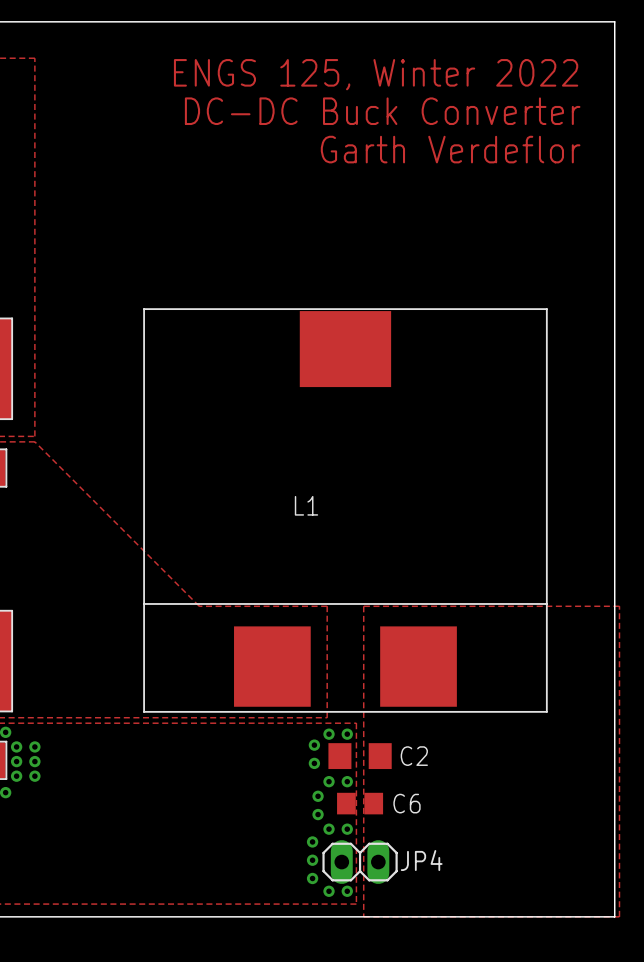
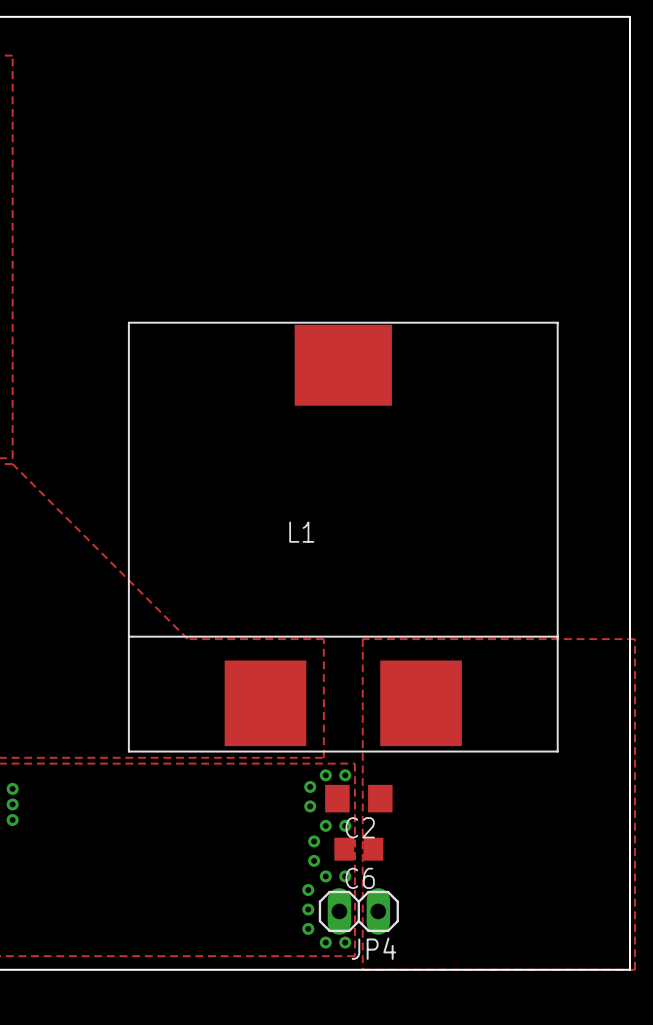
text: ENGS 125, Winter 2022 (376, 74) -> none
text: DC-DC Buck Converter (382, 111) -> none
text: Garth Verdeflor (450, 149) -> none
C2 name position: C2 (414, 756) -> C2 (360, 827)
C6 name position: C6 (406, 803) -> C6 (360, 878)
JP4 name position: JP4 (421, 860) -> JP4 (373, 948)

